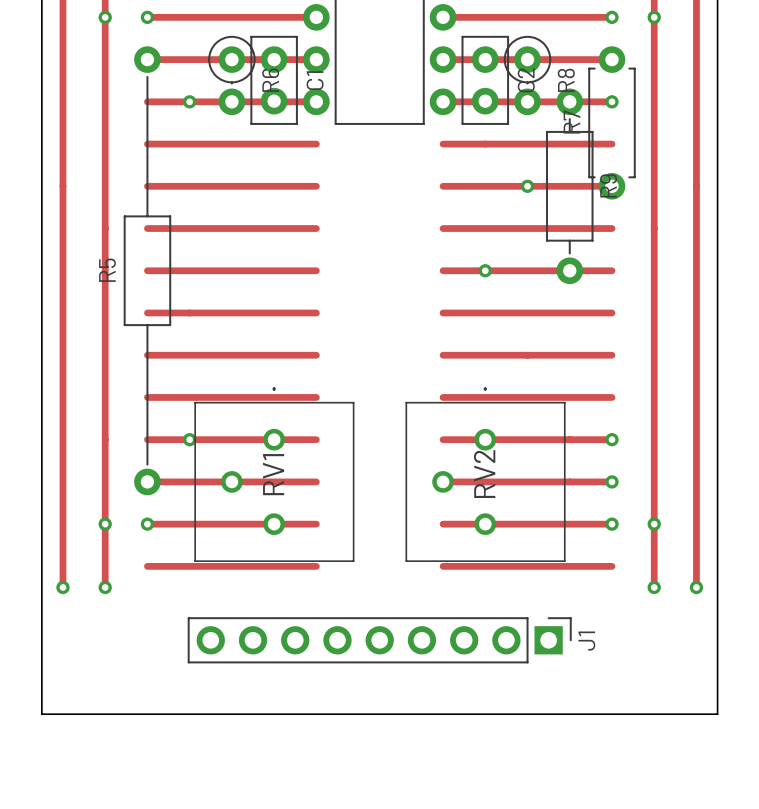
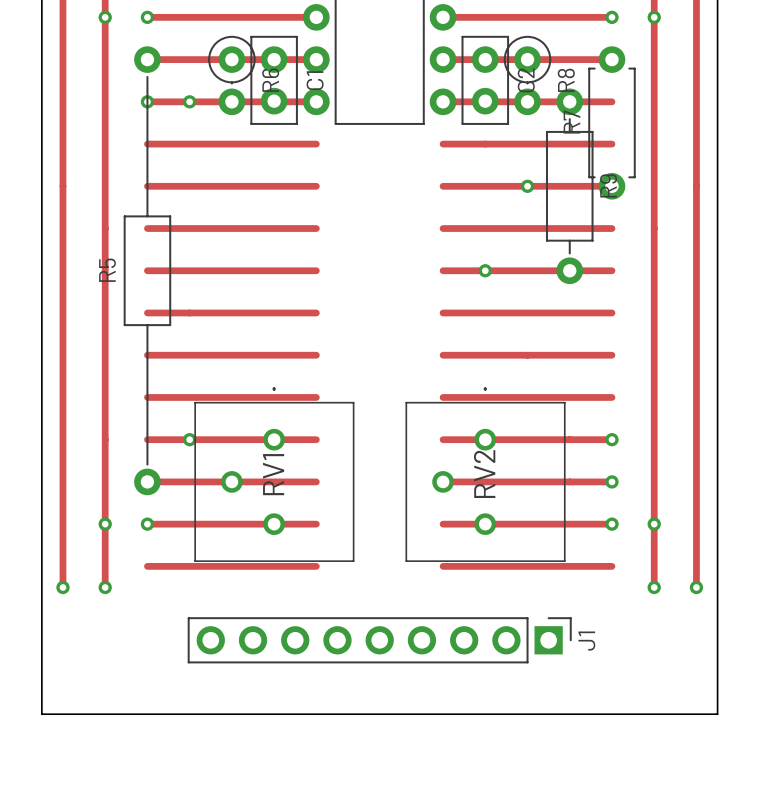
via: none -> (147, 101)
via: (611, 101) -> none

